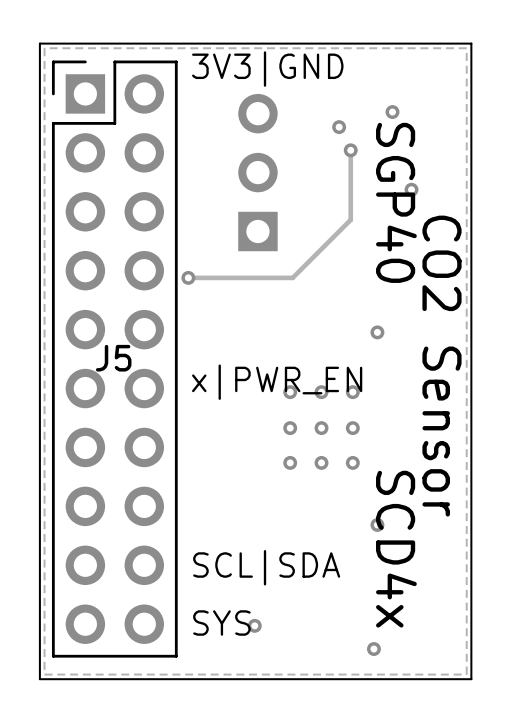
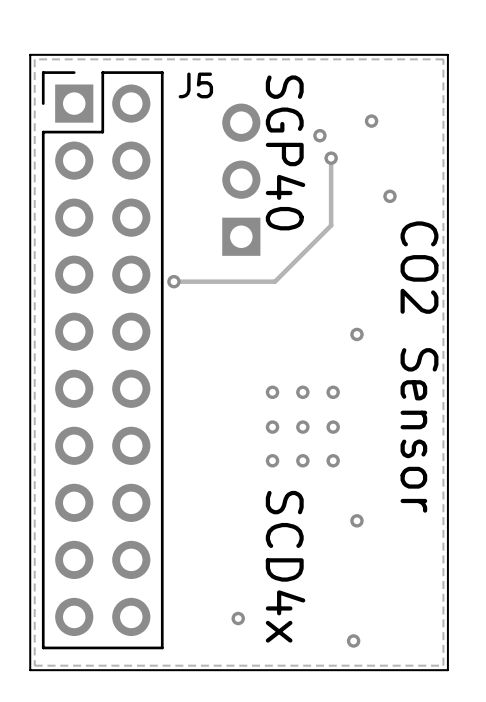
text: 3V3|GND (267, 69) -> none
text position: SGP40 (396, 202) -> SGP40 (285, 152)
J5 name position: J5 (113, 358) -> J5 (195, 85)
text: x|PWR_EN (277, 382) -> none
text position: SCD4x (396, 549) -> SCD4x (285, 566)
text: SCL|SDA (266, 567) -> none
text: SYS (221, 623) -> none

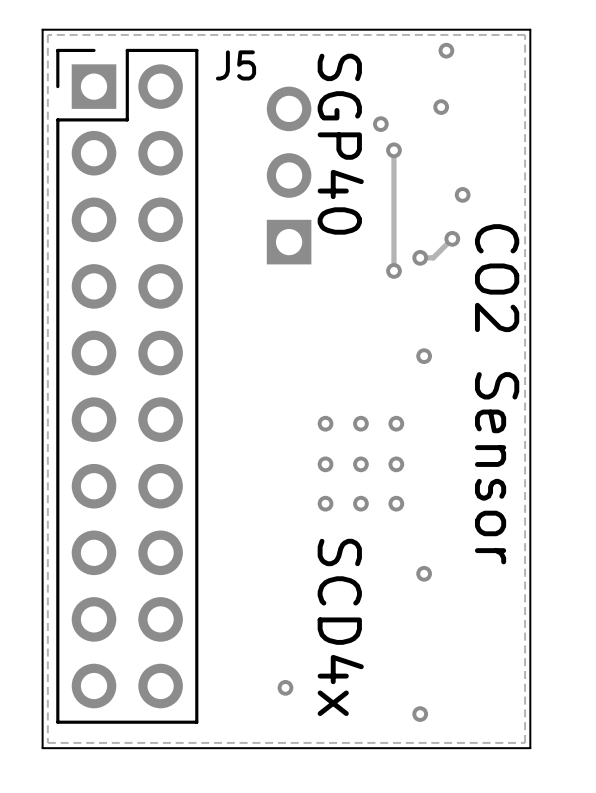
via: none -> (446, 50)
track: (331, 225) (275, 281) (173, 281) -> (393, 228) (393, 270)
track: none -> (452, 238) (433, 257) (420, 257)
via: none -> (452, 238)
via: none -> (420, 257)
via: none -> (393, 270)
via: (173, 281) -> none

